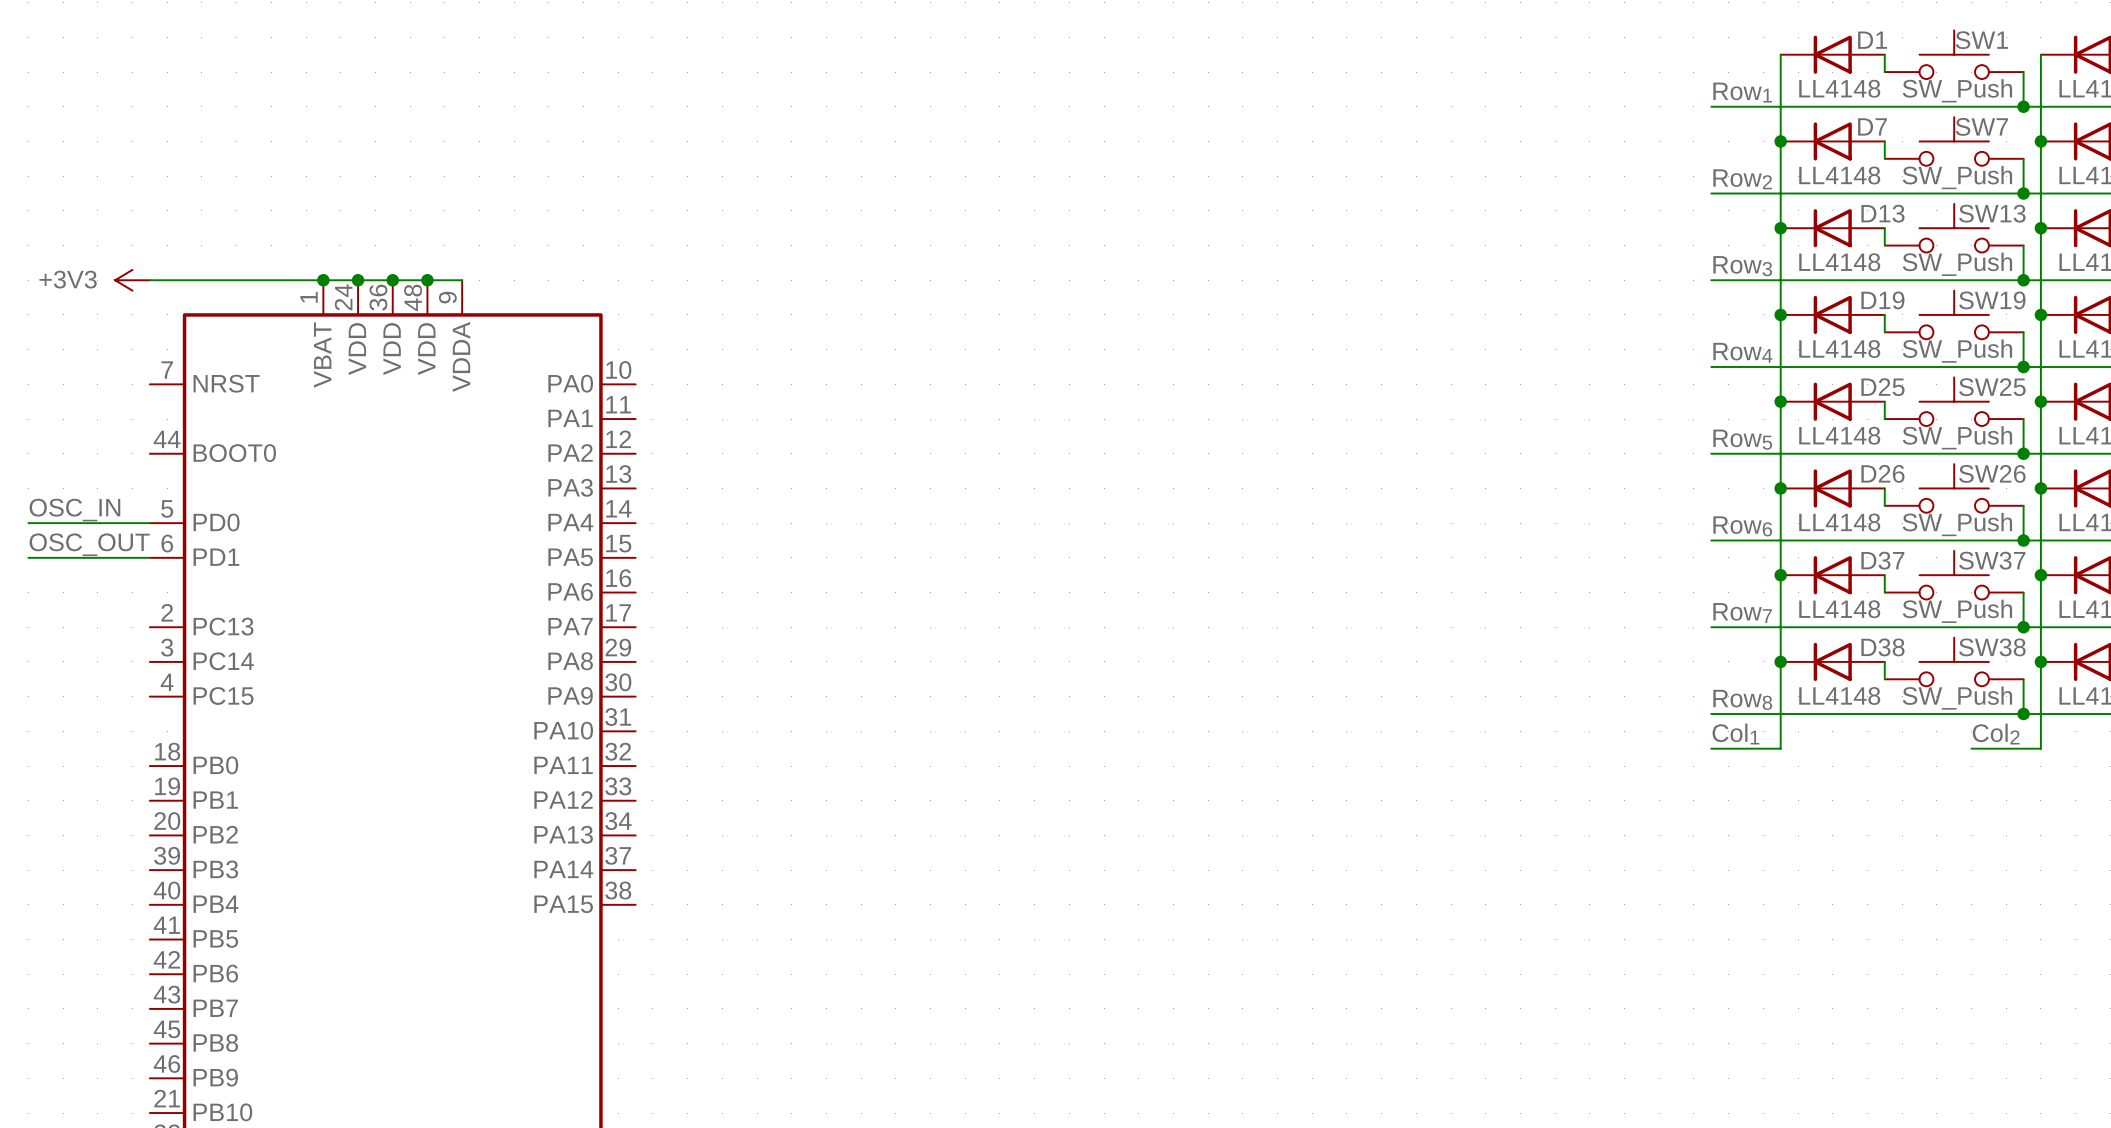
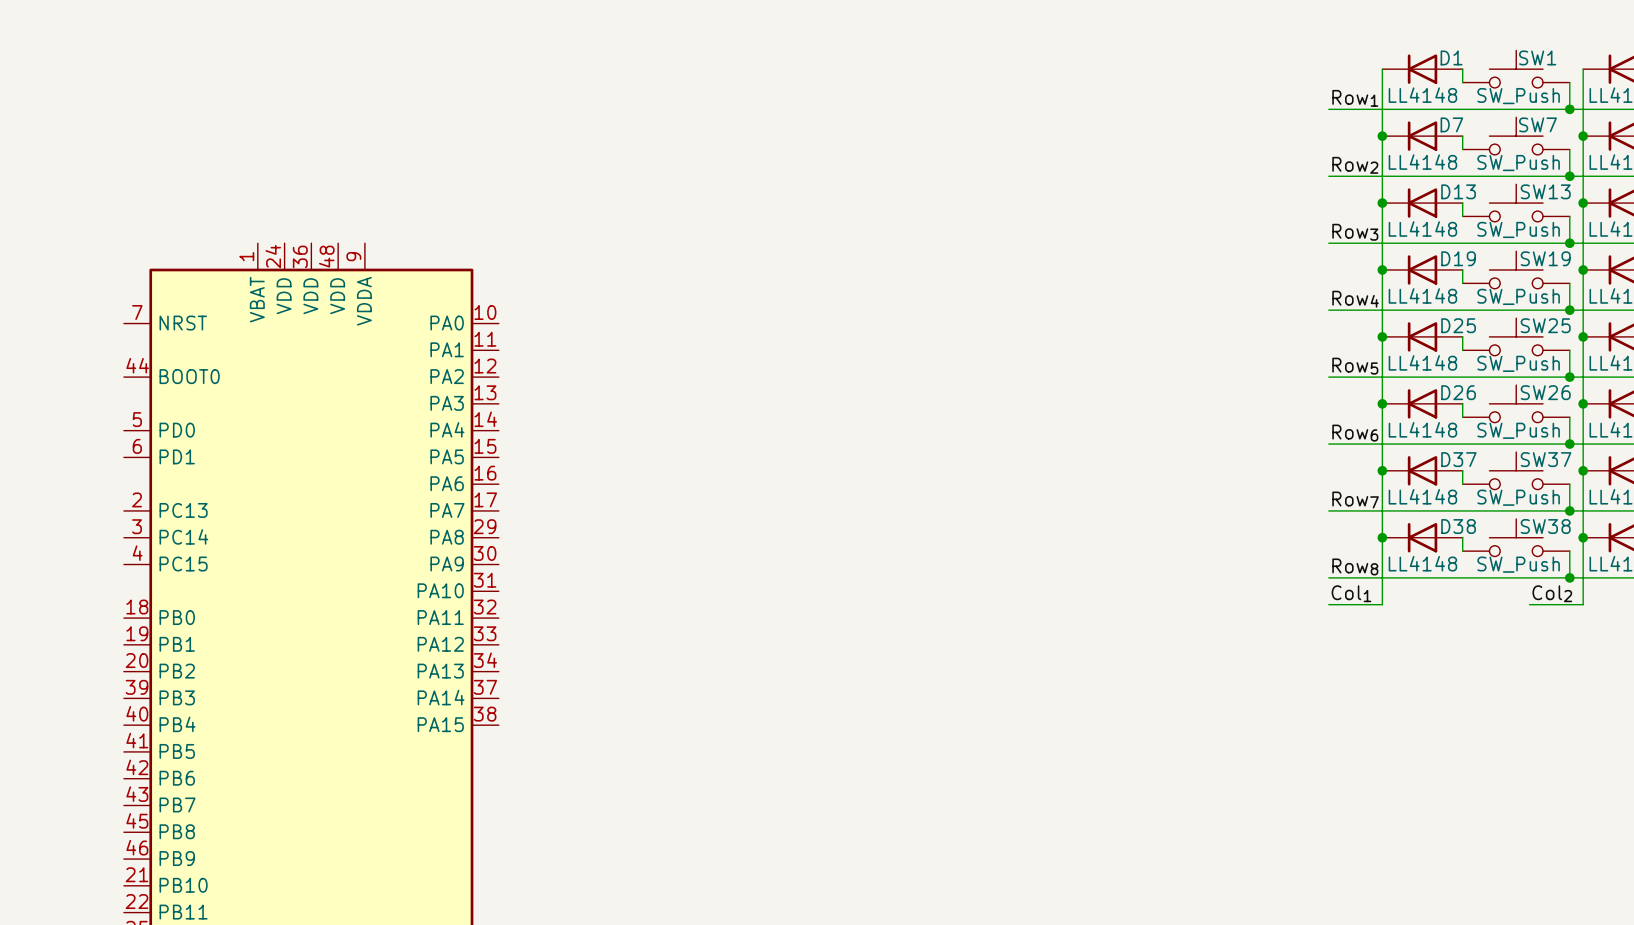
power symbol: +3V3 (132, 280) -> none
wire: (149, 280) (462, 280) -> none
junction: (323, 280) -> none
junction: (358, 280) -> none
junction: (392, 280) -> none
junction: (427, 280) -> none
label: OSC_IN (74, 510) -> none
wire: (28, 523) (149, 523) -> none
label: OSC_OUT (89, 544) -> none
wire: (28, 557) (149, 557) -> none

